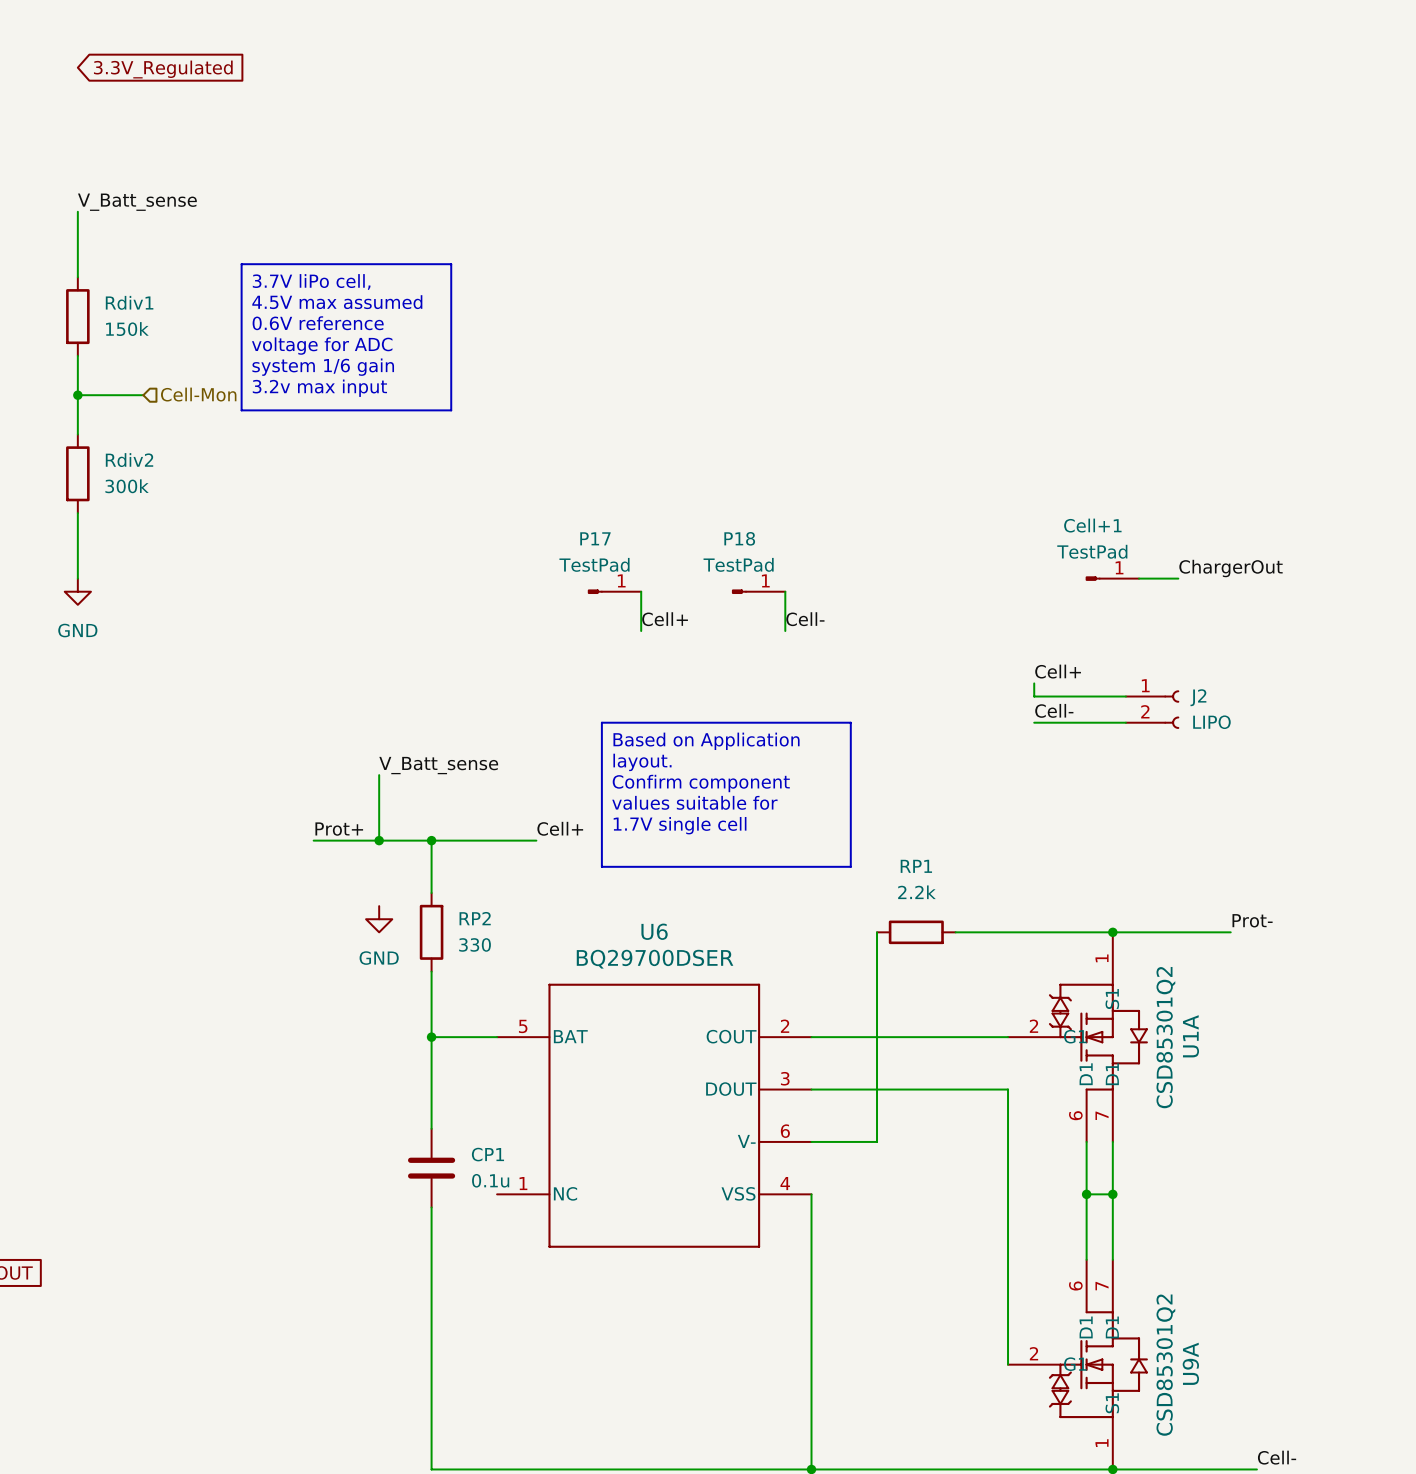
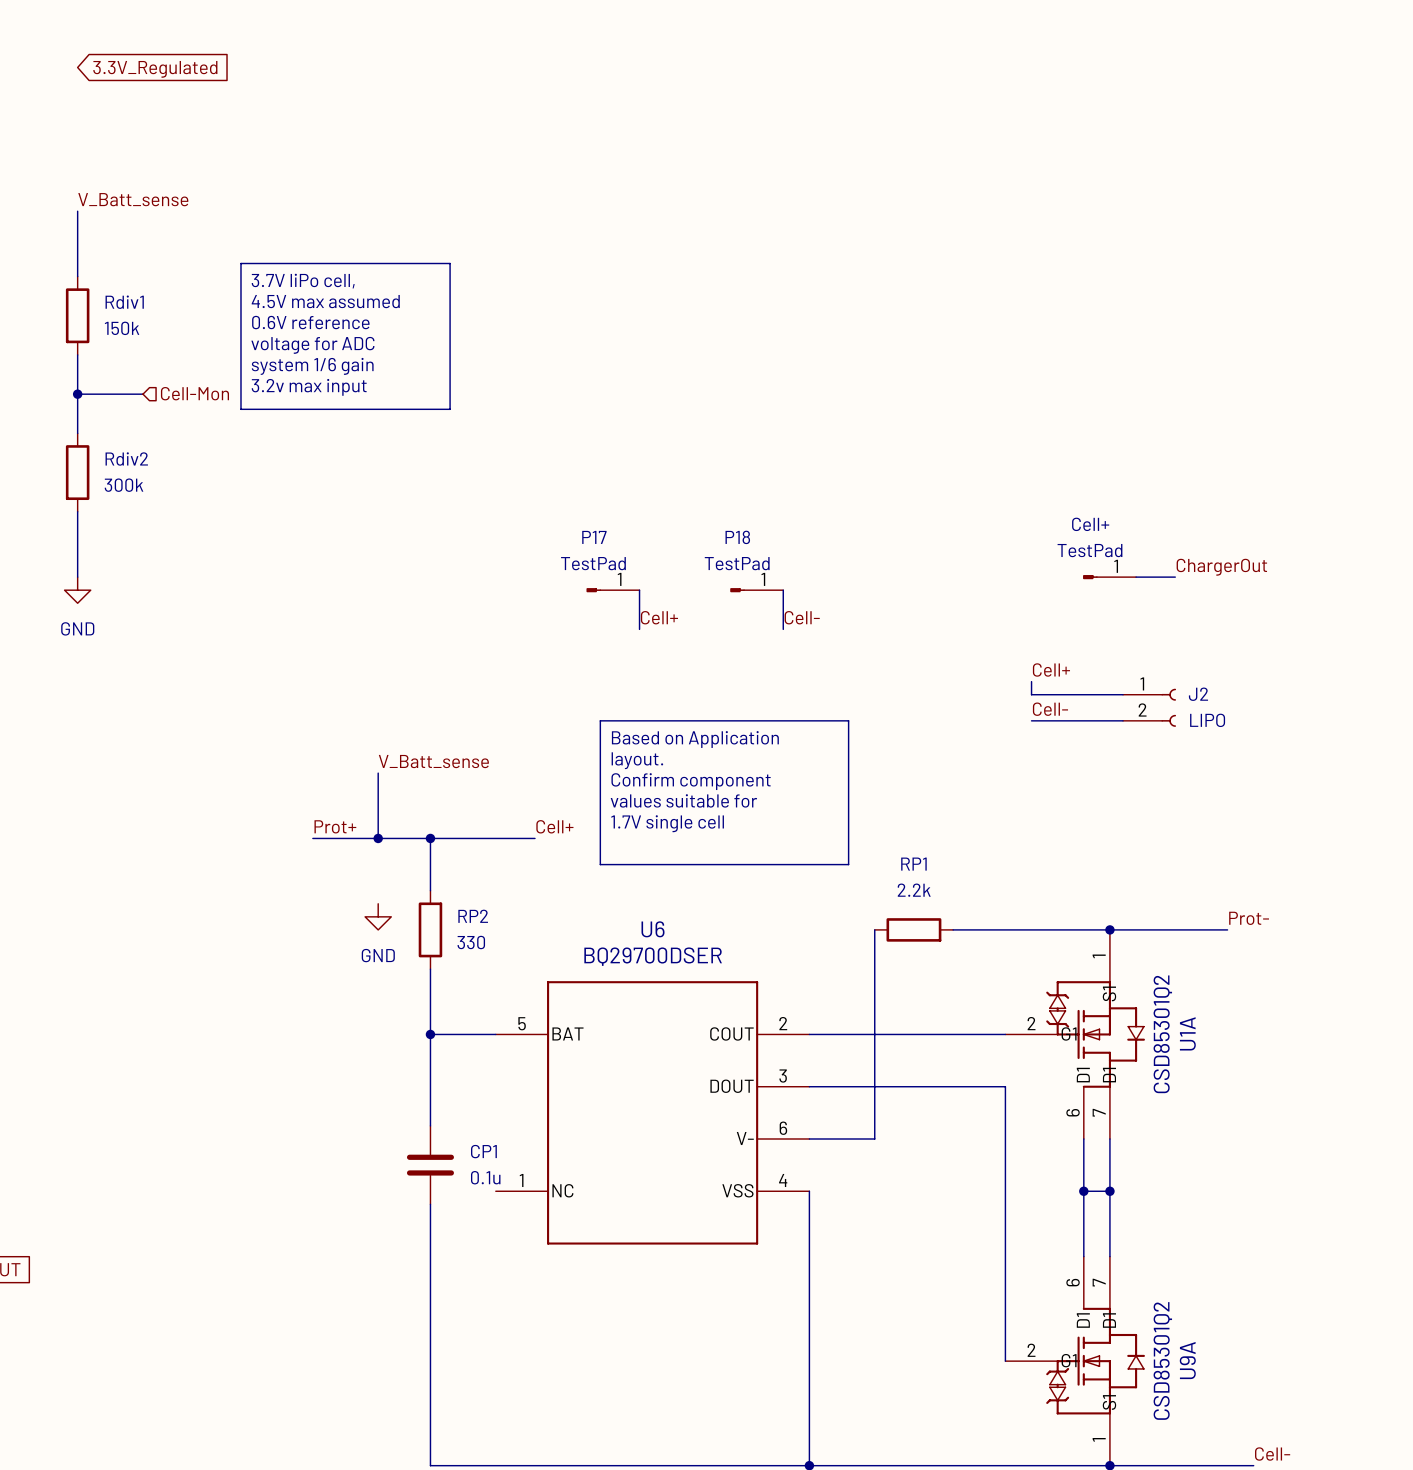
Cell+1 name: Cell+1 (1092, 525) -> Cell+ (1090, 524)

